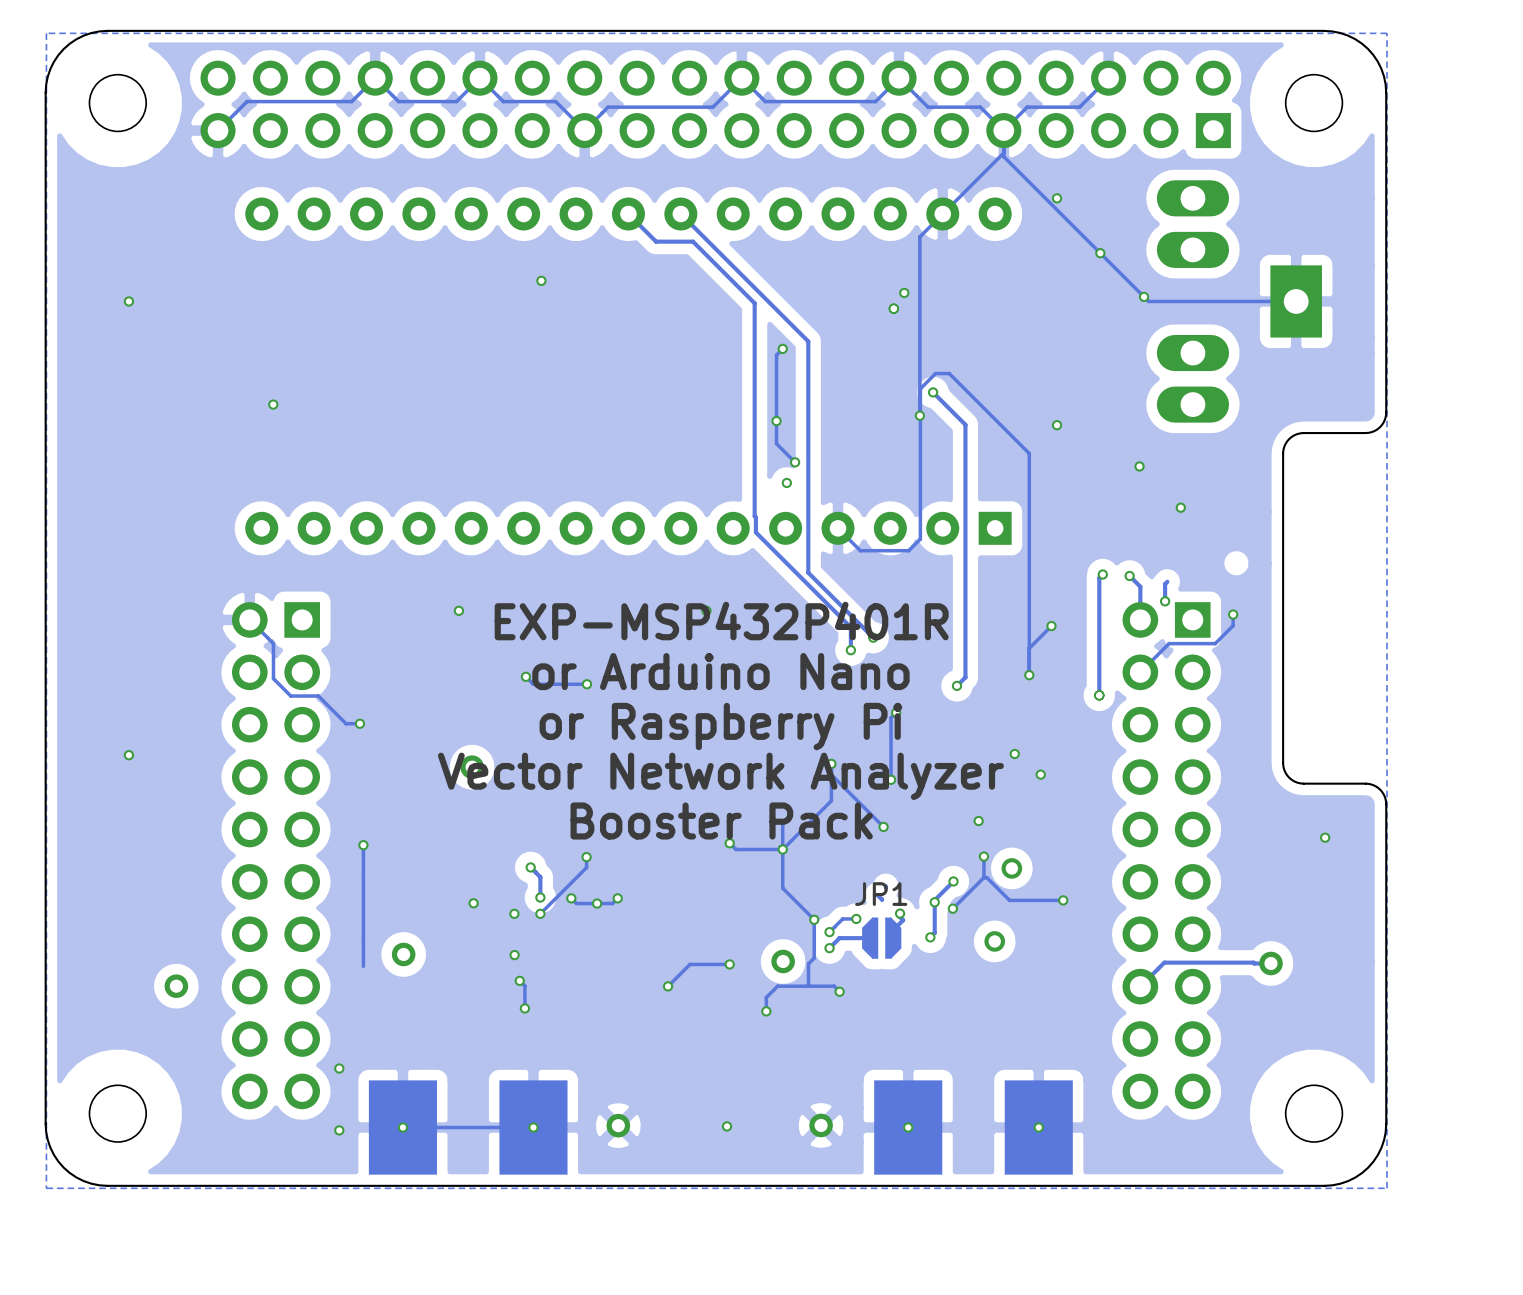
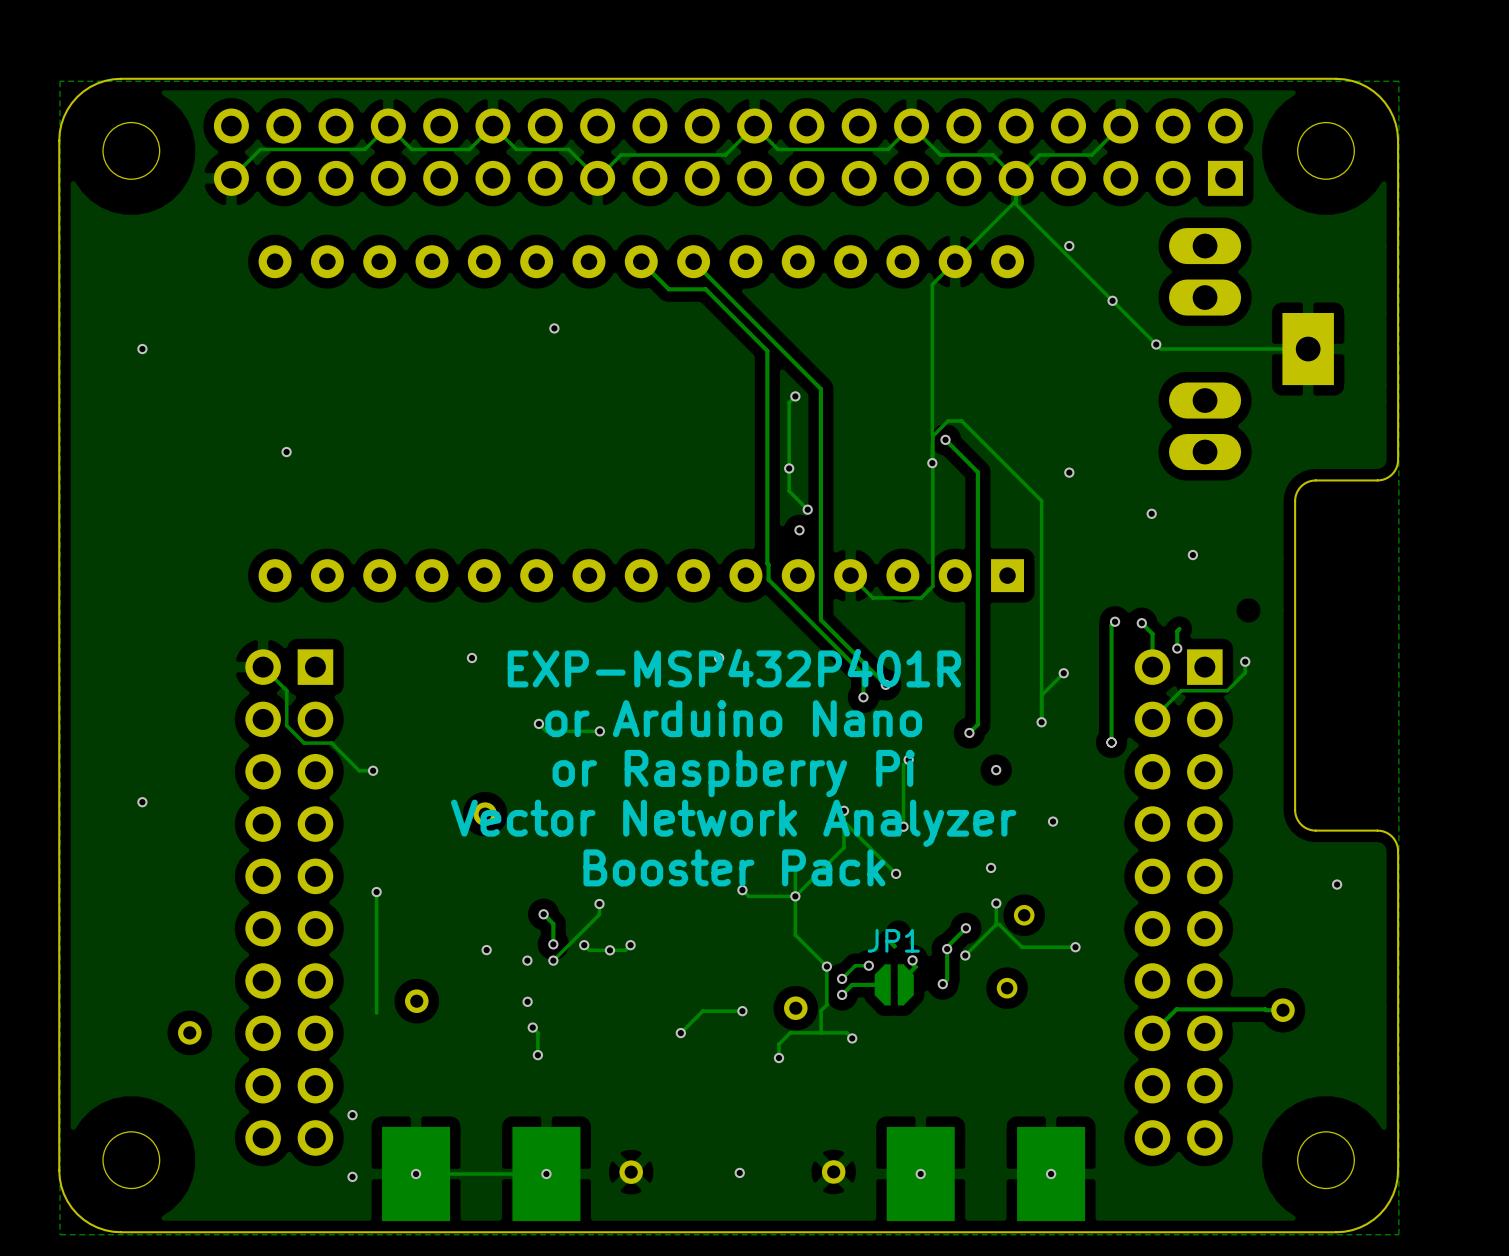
via: (904, 292) -> none
via: (893, 308) -> none
via position: (1014, 754) -> (996, 770)

